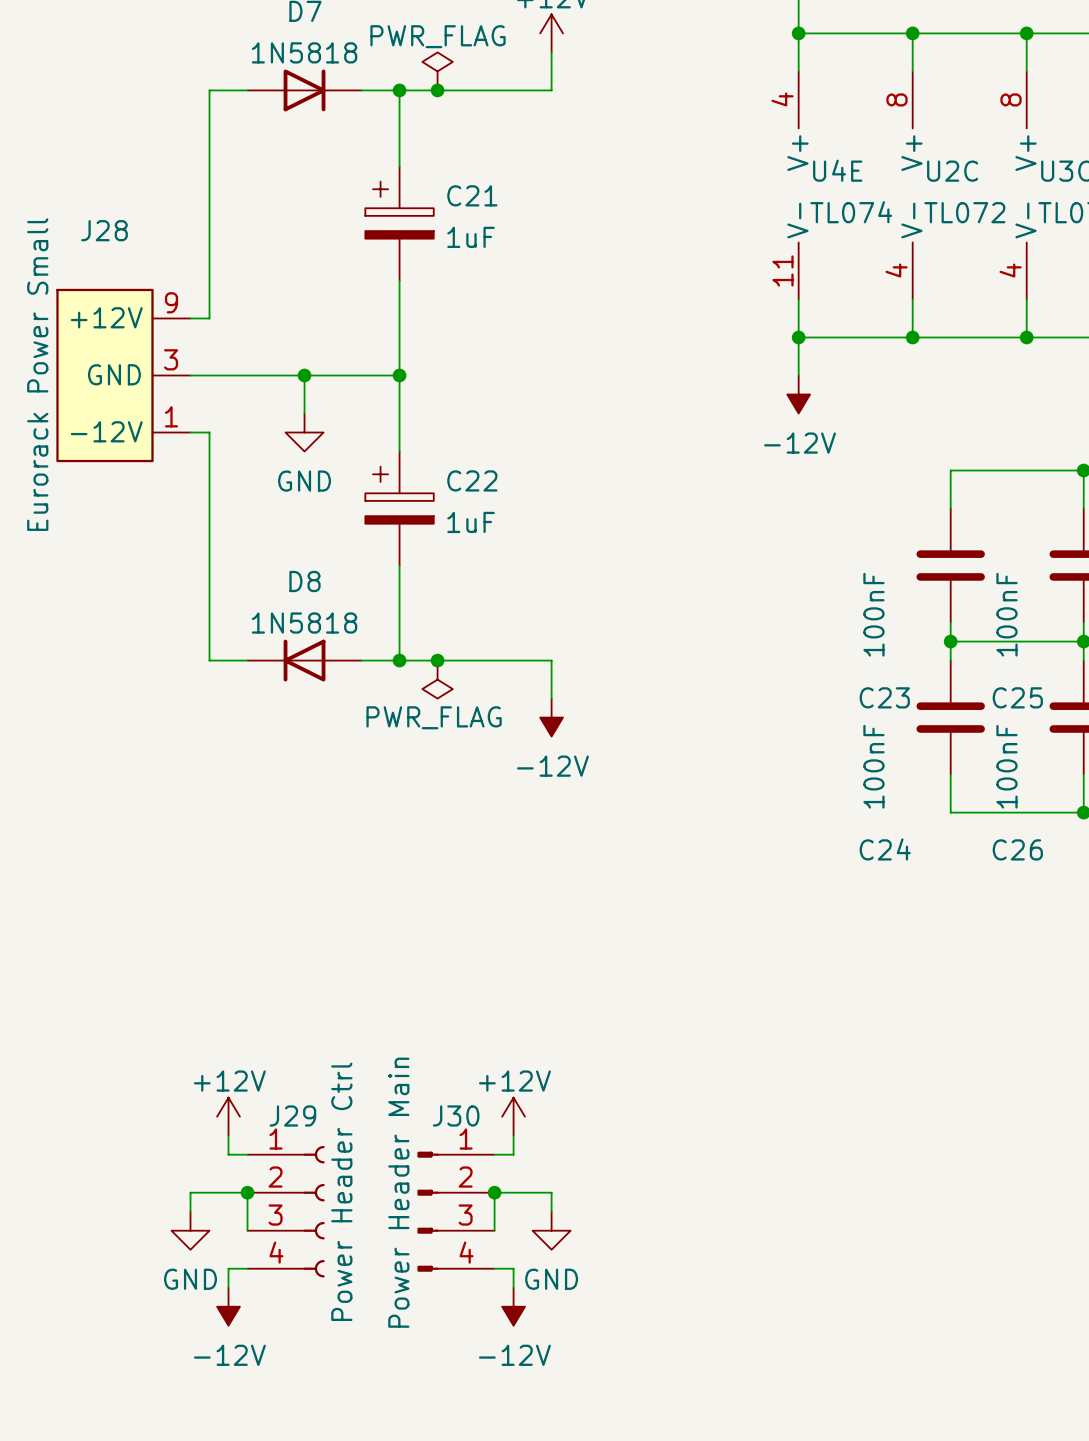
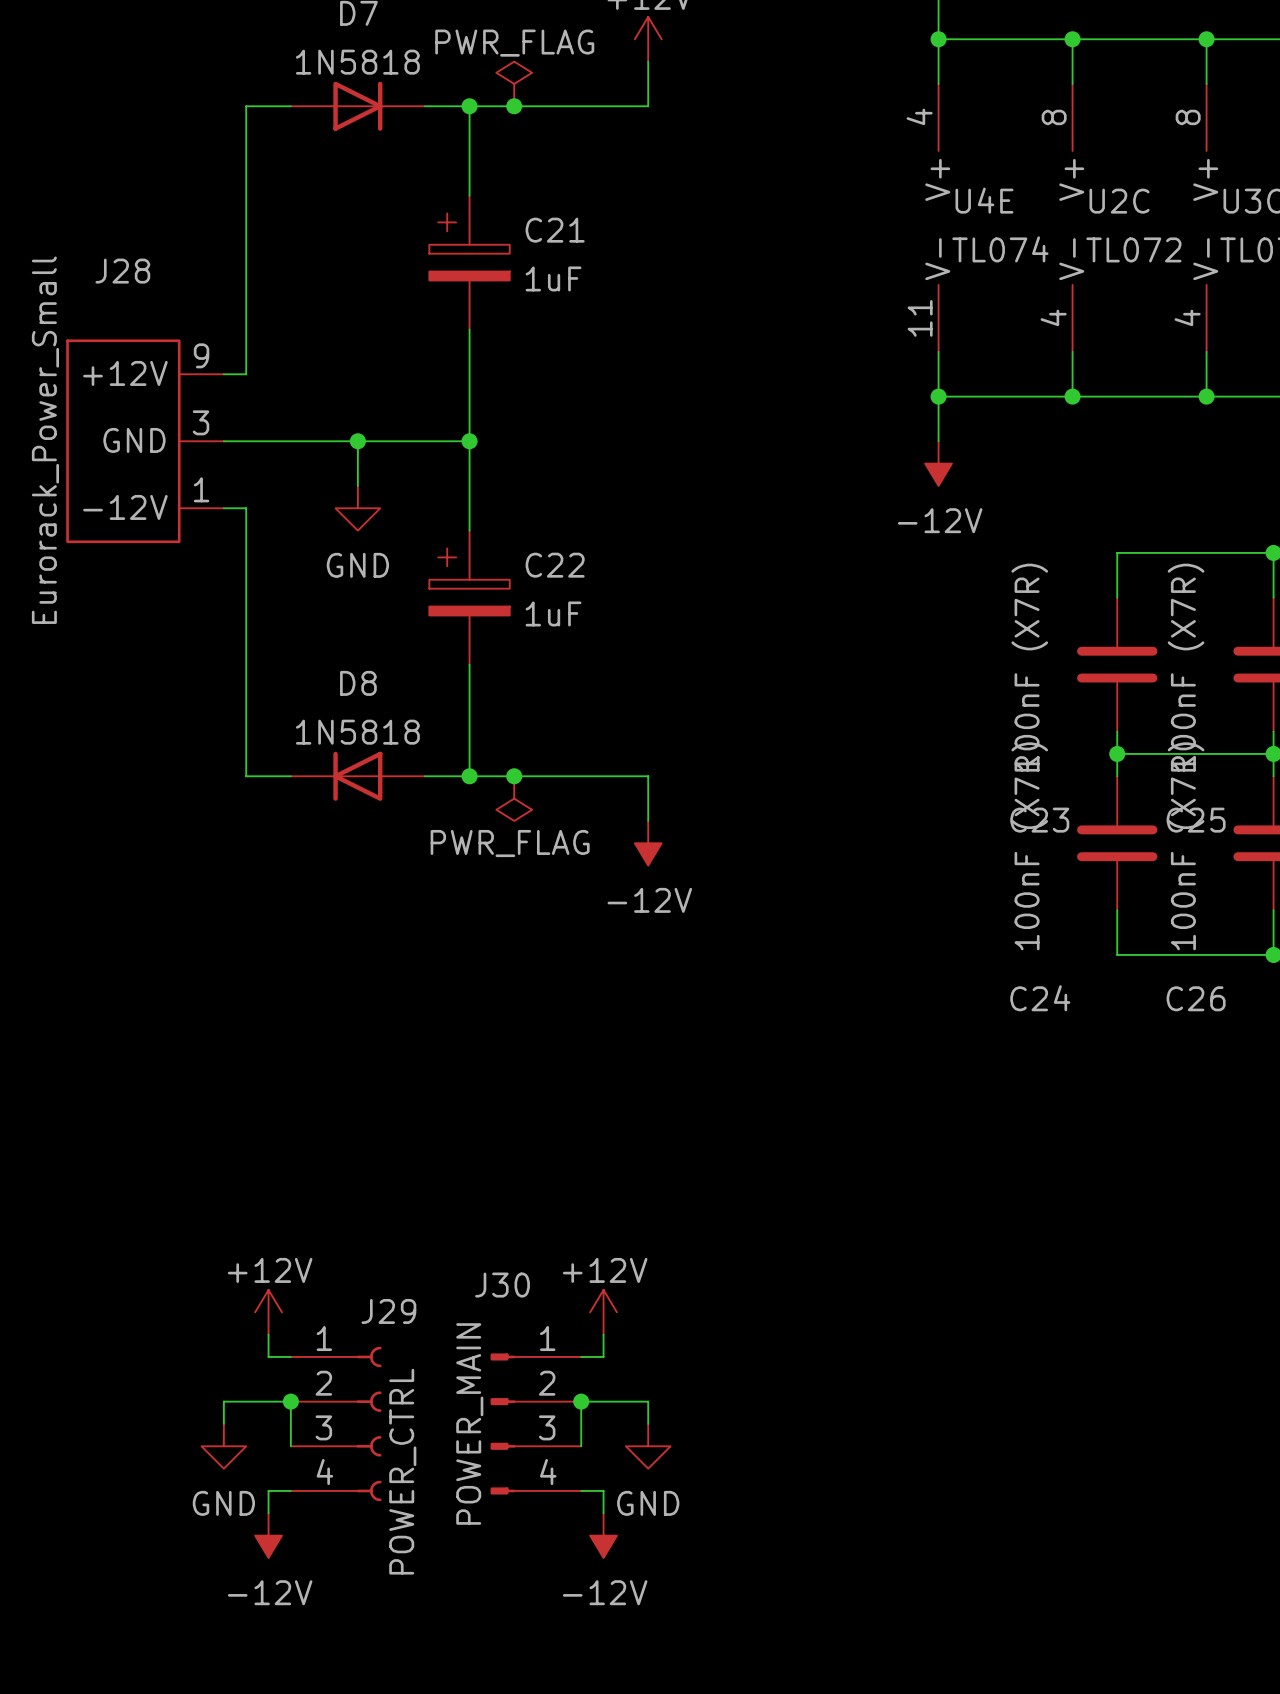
J28 value: Eurorack Power Small (37, 374) -> Eurorack_Power_Small (45, 440)
C23 value: 100nF (873, 614) -> 100nF (X7R) (1029, 667)
C25 value: 100nF (1007, 614) -> 100nF (X7R) (1186, 667)
C24 value: 100nF (873, 766) -> 100nF (X7R) (1029, 846)
C26 value: 100nF (1007, 766) -> 100nF (X7R) (1186, 846)
J29 name position: J29 (292, 1115) -> J29 (388, 1311)
J30 name position: J30 (456, 1115) -> J30 (502, 1285)
J29 text: Power Header Ctrl (341, 1191) -> none
J30 text: Power Header Main (398, 1192) -> none
J30 value: none -> POWER_MAIN (469, 1423)
J29 value: none -> POWER_CTRL (402, 1471)

